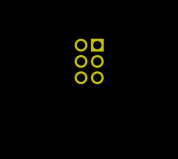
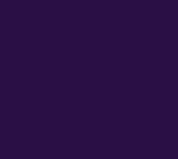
part: (89, 61) -> none

